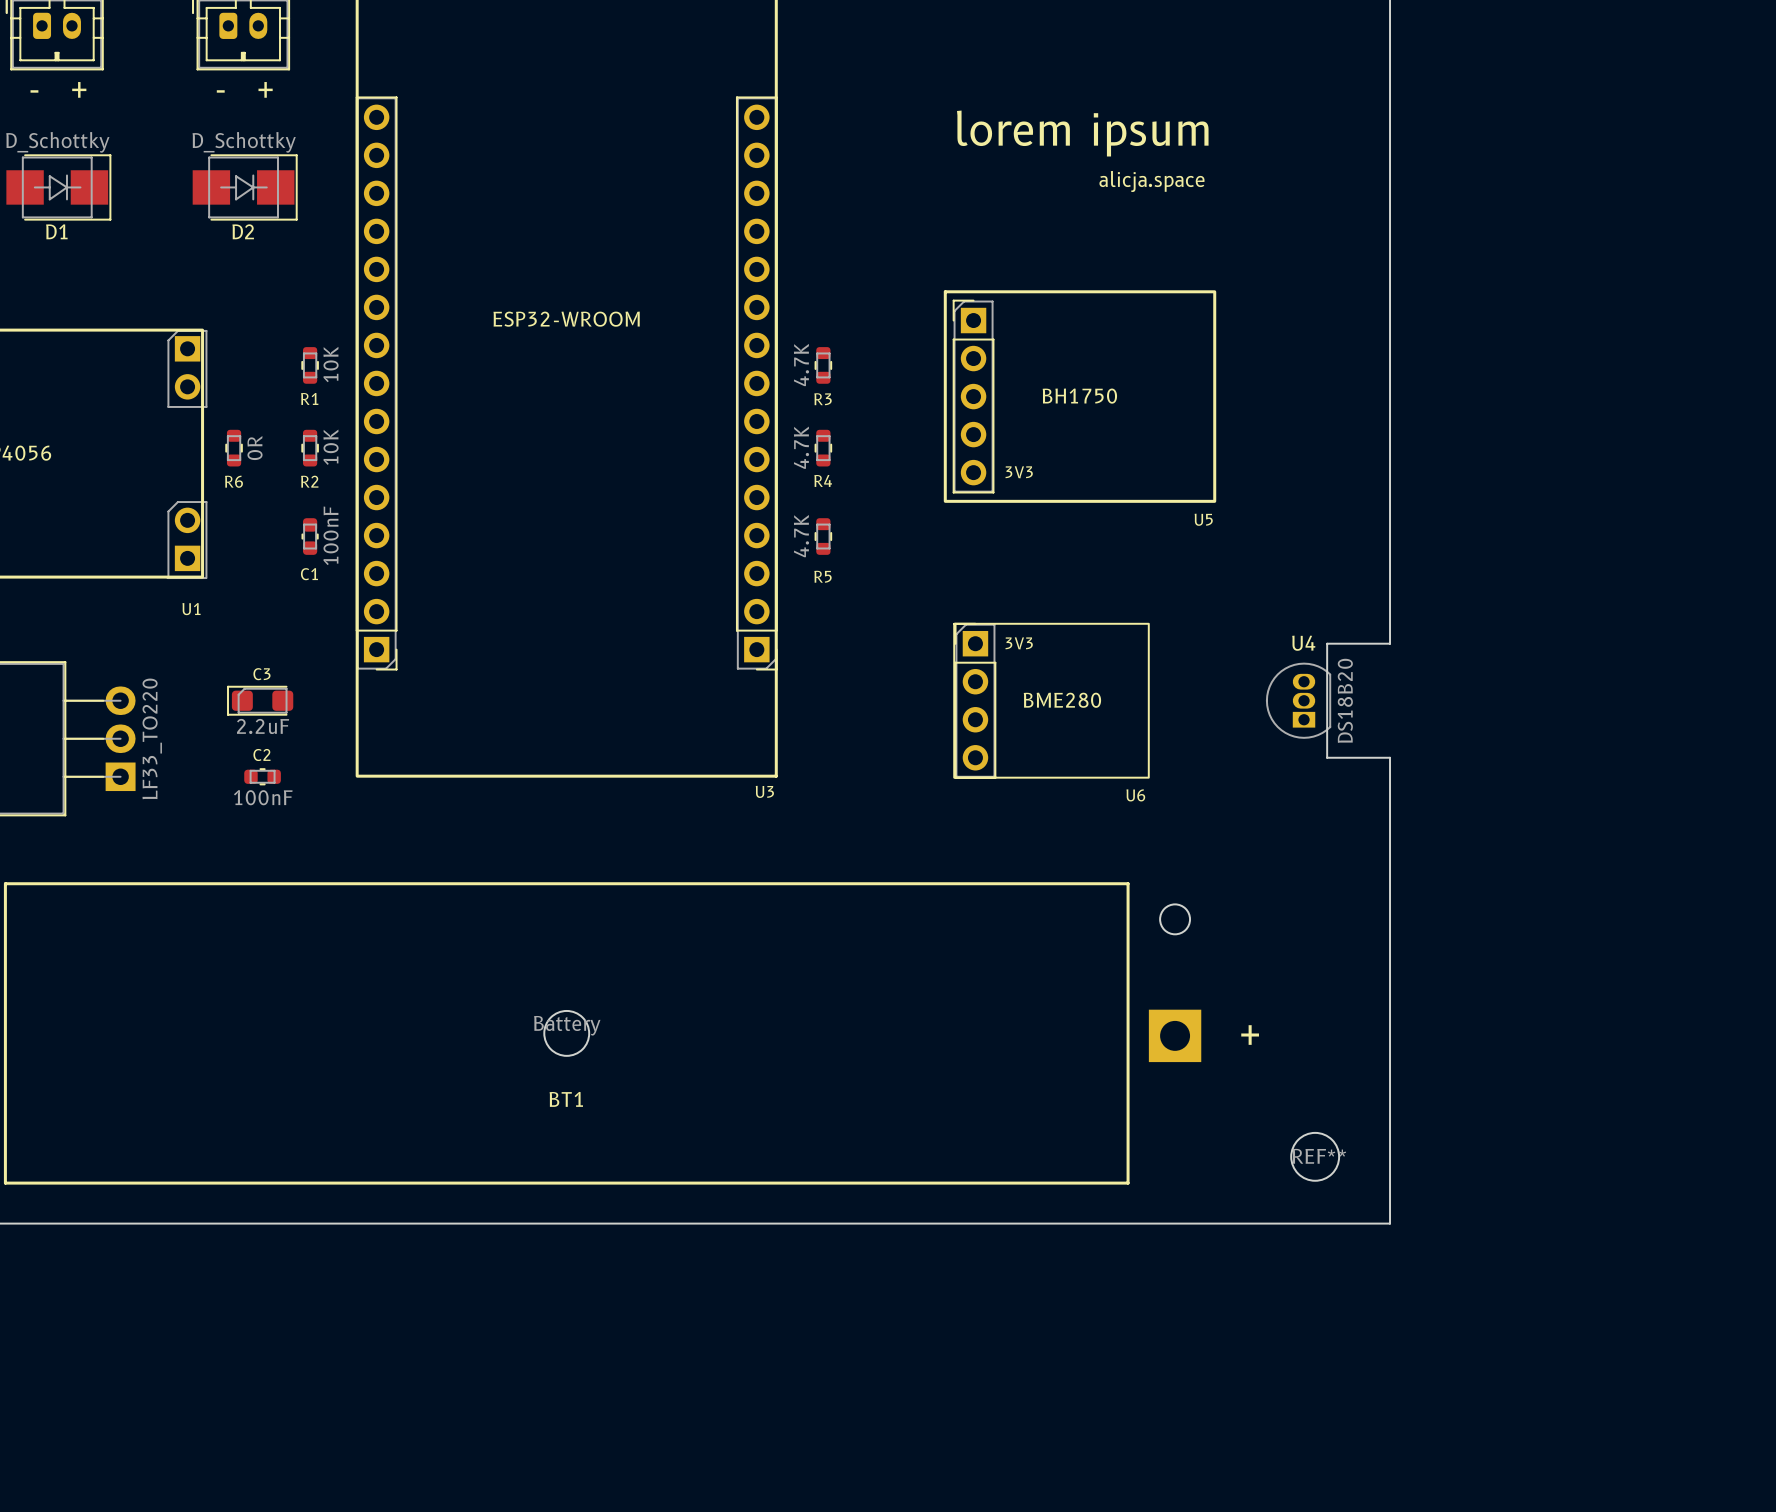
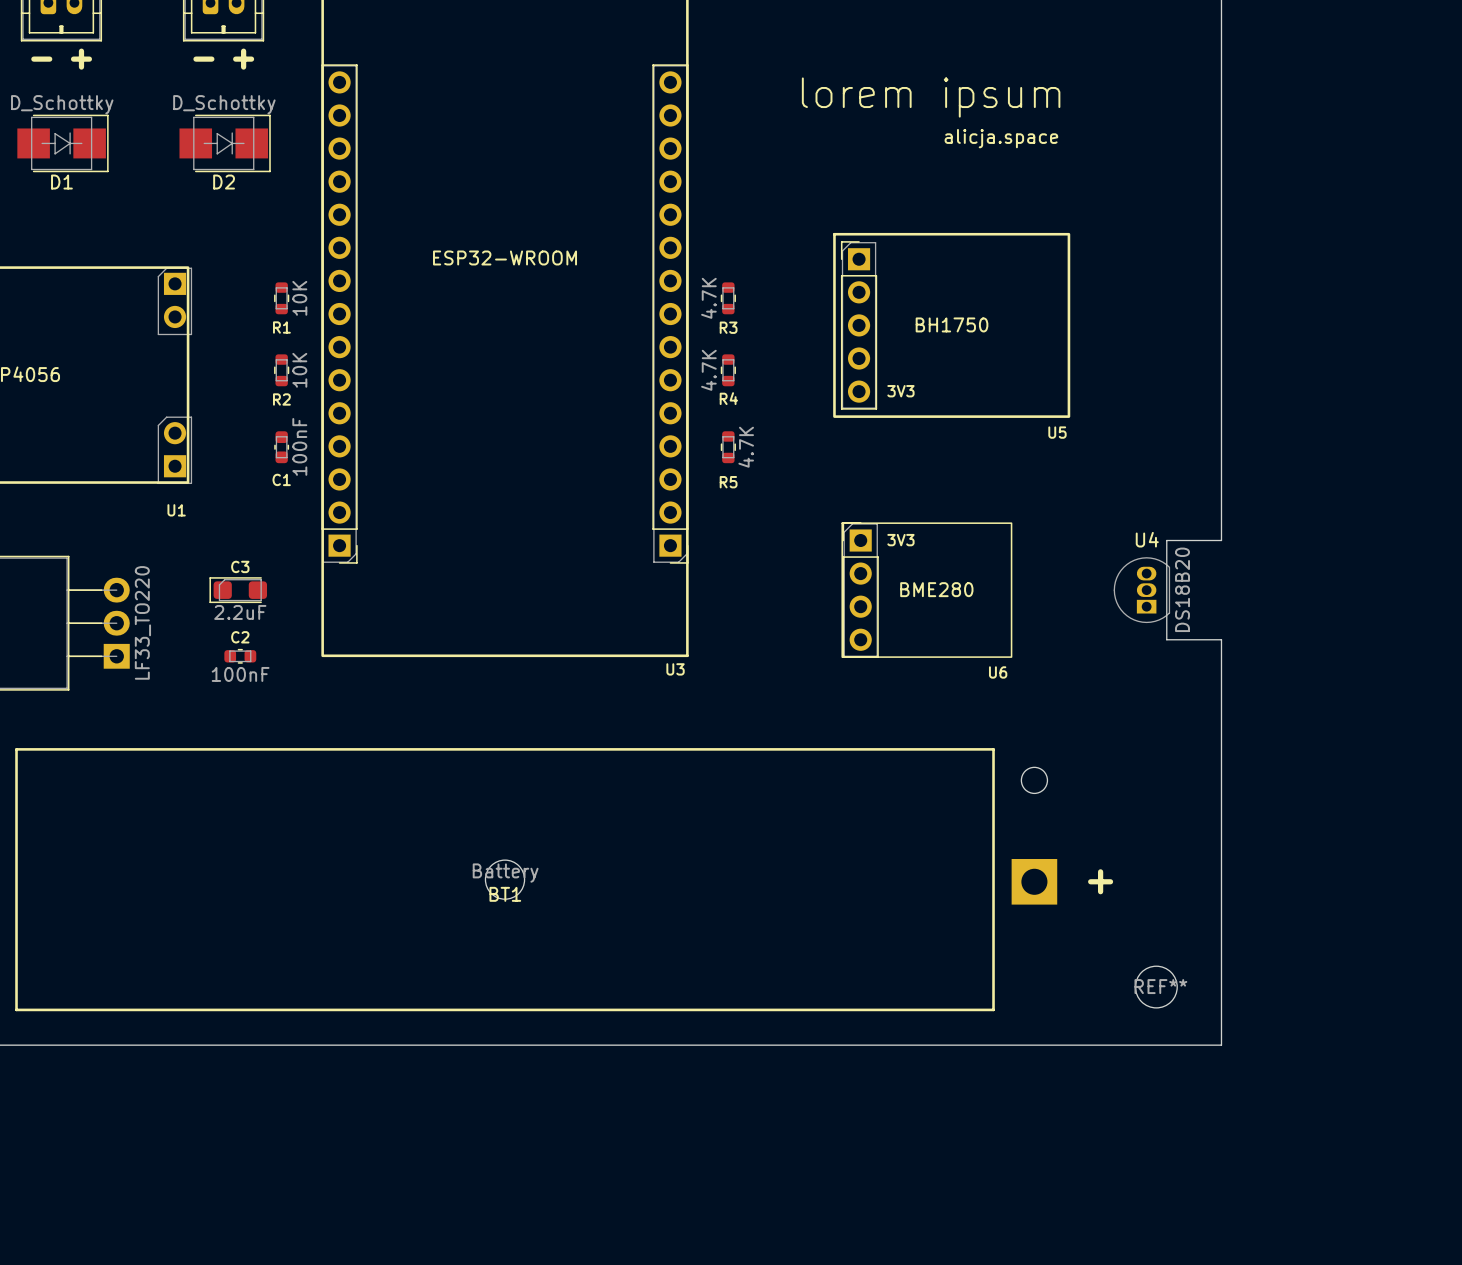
R6: 0R (234, 448) -> none
R5 value position: 4.7K (801, 536) -> 4.7K (746, 447)
BT1 name position: BT1 (566, 1099) -> BT1 (505, 894)

